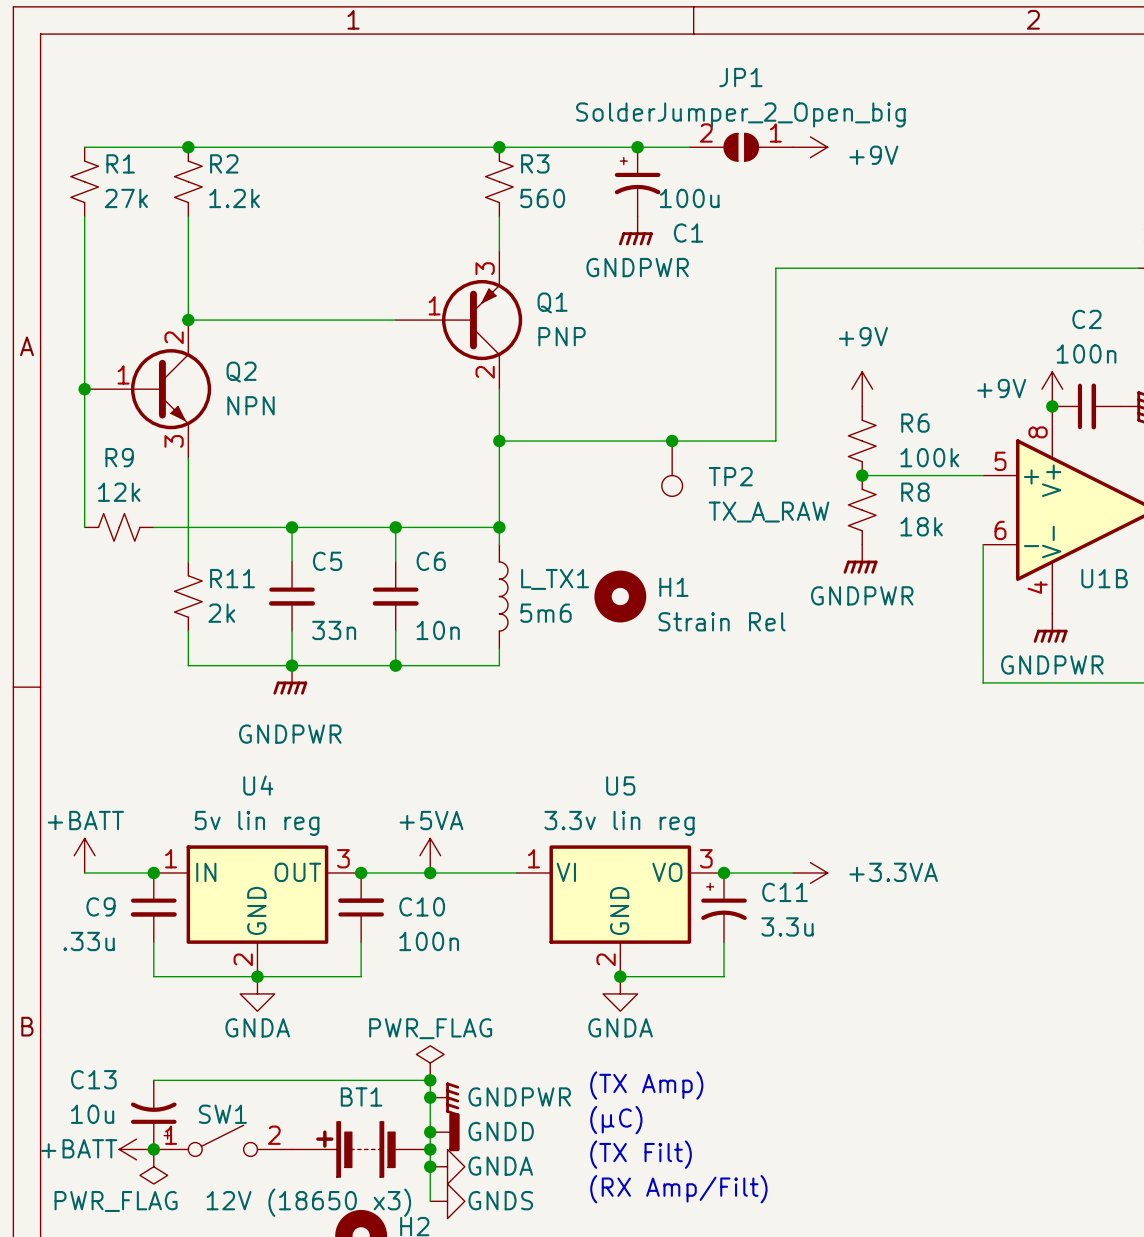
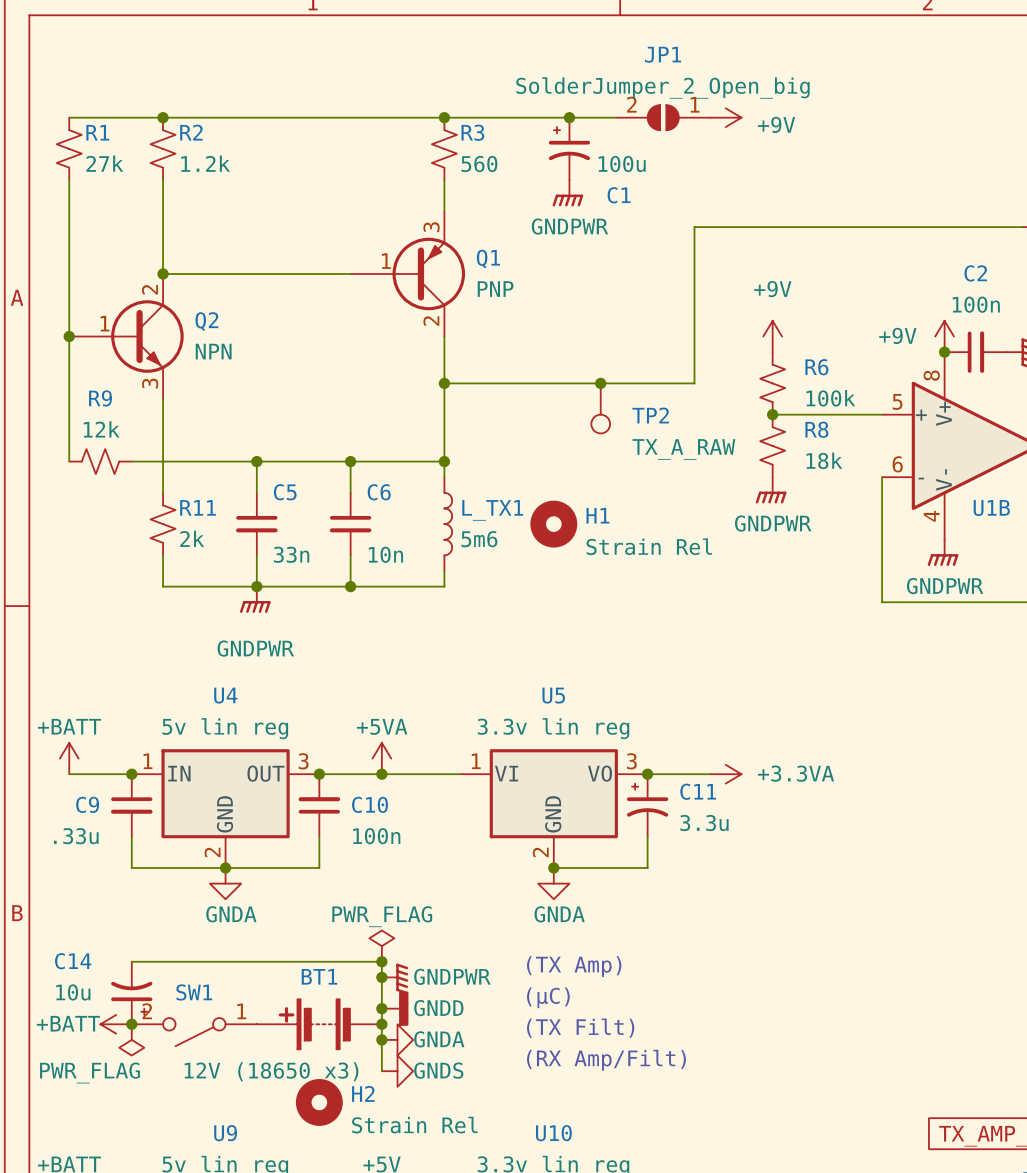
C13 name: C13 (93, 1079) -> C14 (73, 961)
SW1 rotation: 0° (222, 1140) -> 180° (194, 1032)

